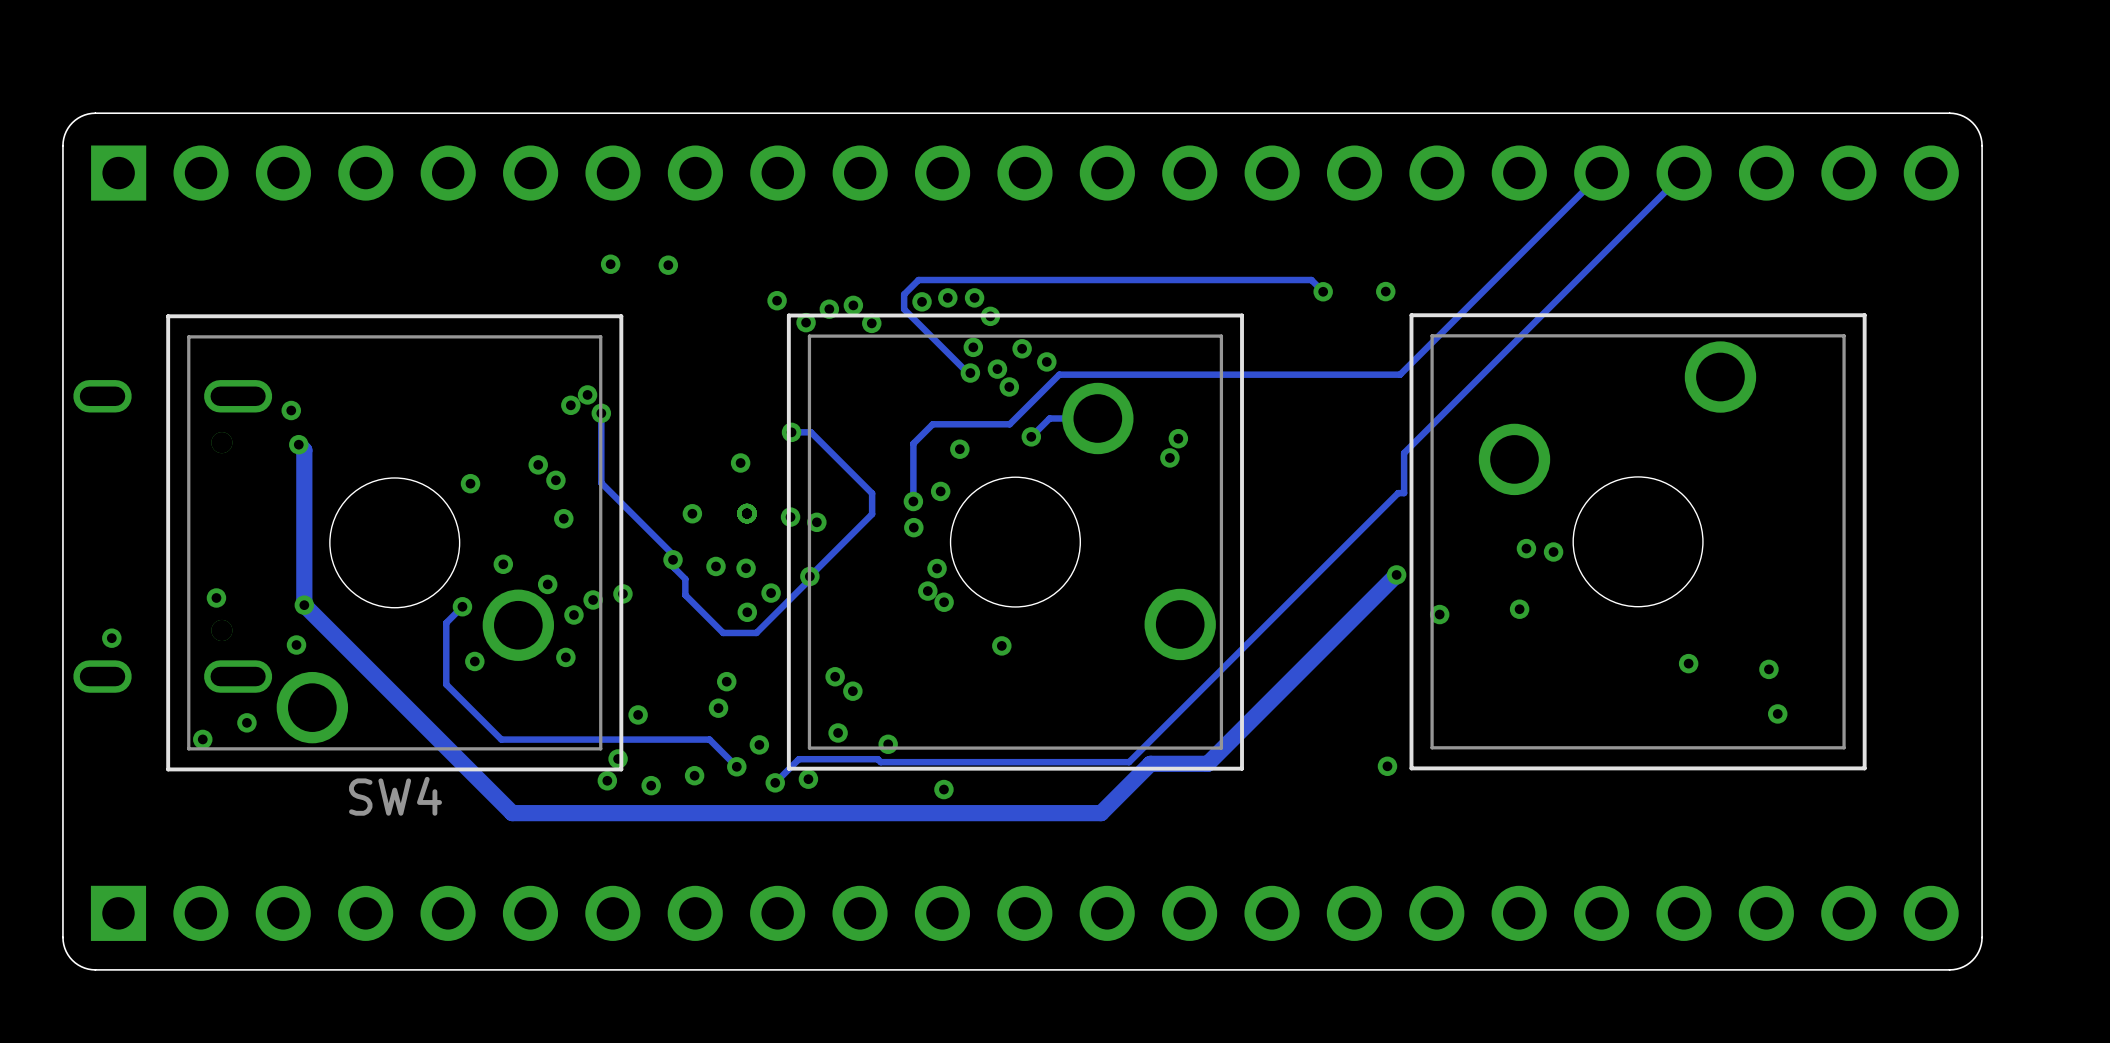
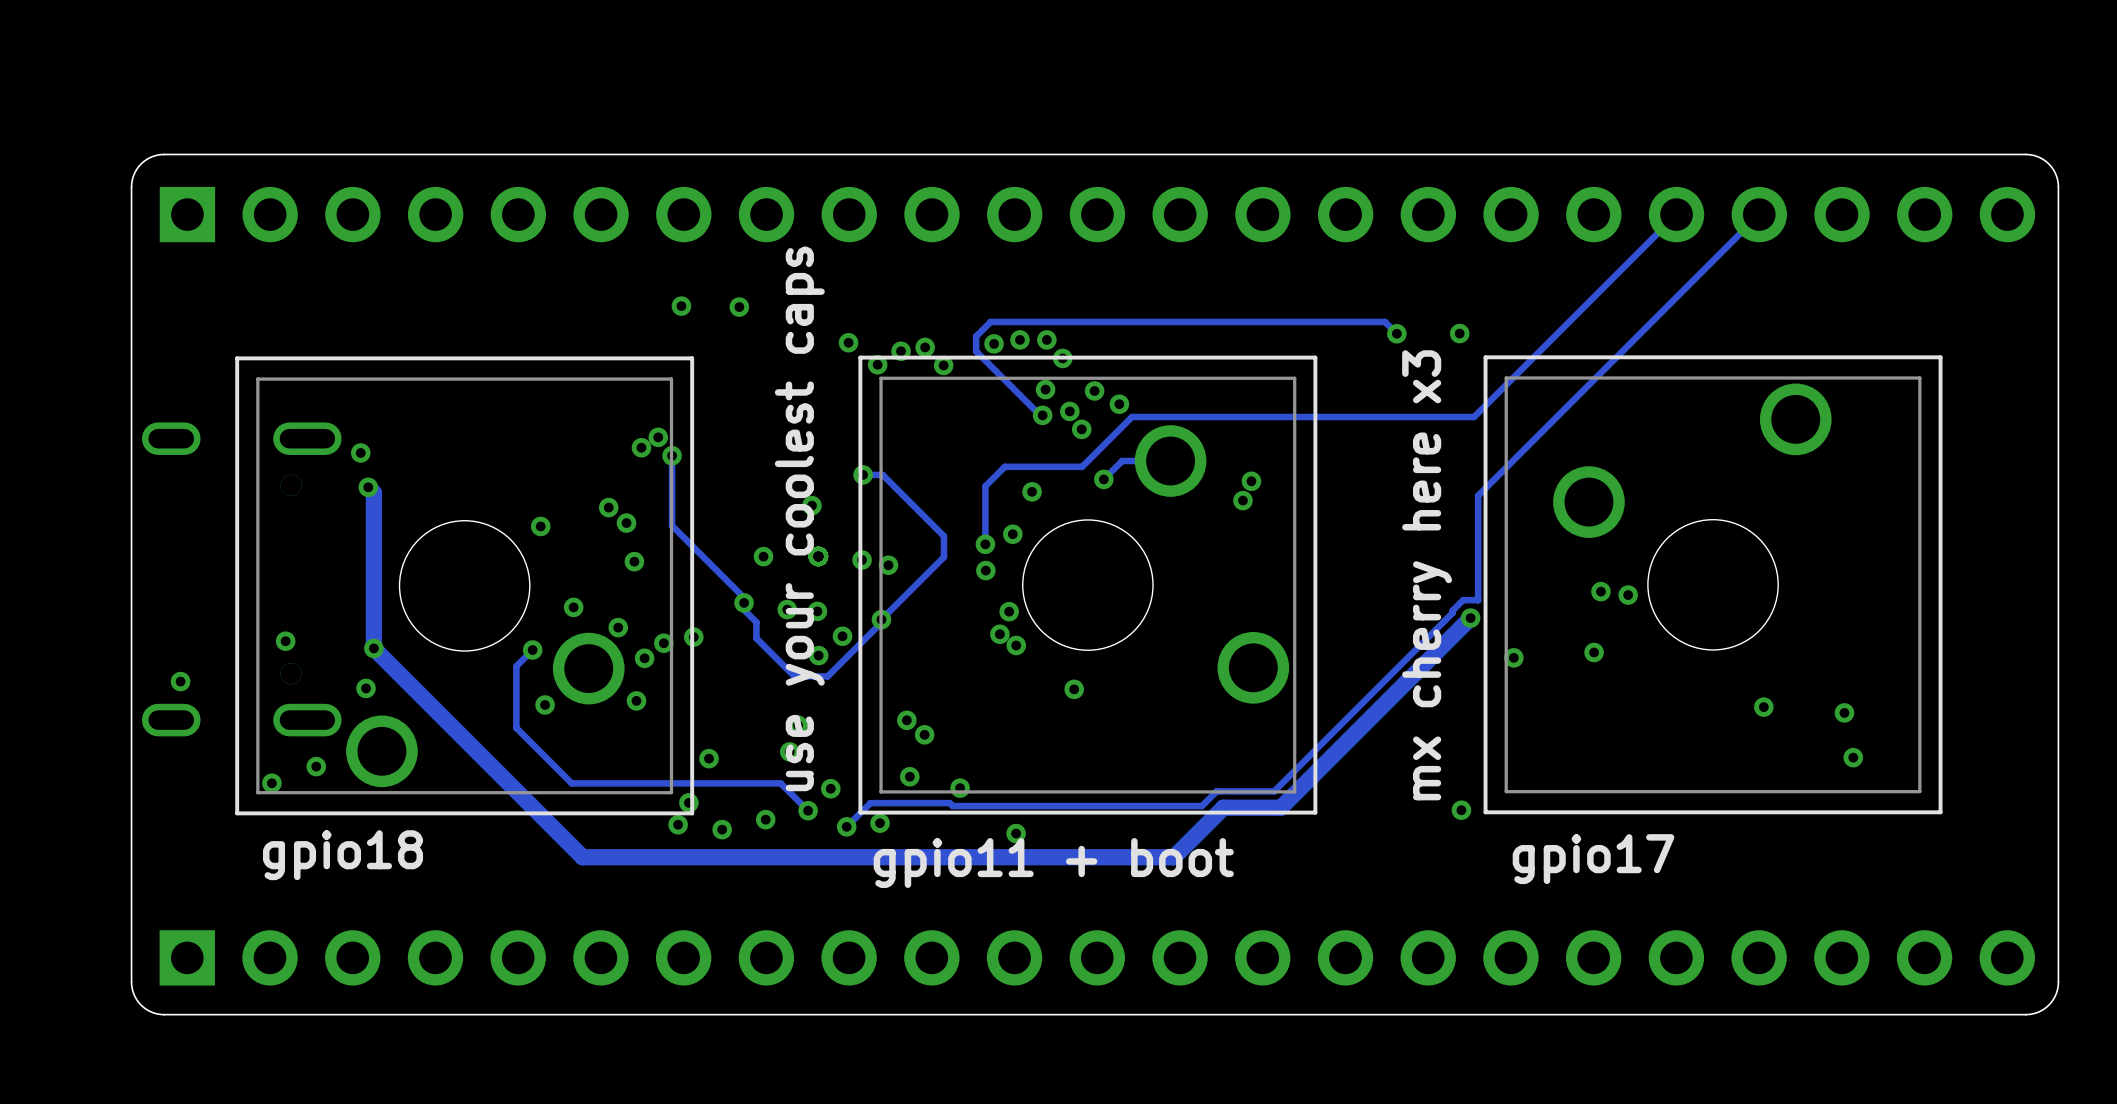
text: none -> use your coolest caps (799, 518)
track: (1404, 493) (1398, 493) (1143, 747) -> (1478, 600) (1463, 600) (1452, 612) (1274, 791) (1216, 791)
track: none -> (1478, 535) (1478, 600)
text: none -> mx cherry here x3 (1427, 575)
SW4 name: SW4 (395, 796) -> none
text: none -> gpio18 (343, 855)
text: none -> gpio17 (1593, 859)
text: none -> gpio11 + boot (1053, 863)

